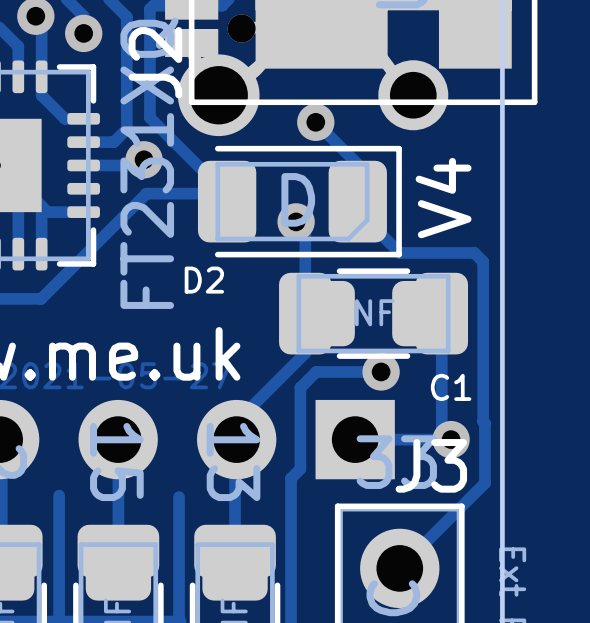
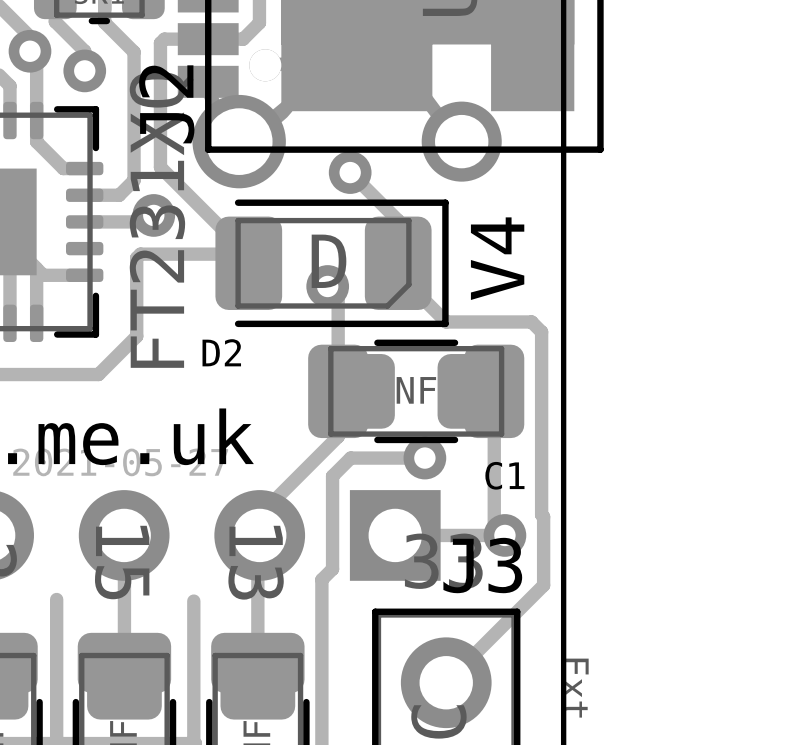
track: (146, 193) (41, 298) -> (156, 254) (140, 254) (136, 257) (136, 336) (98, 374) (36, 374)

